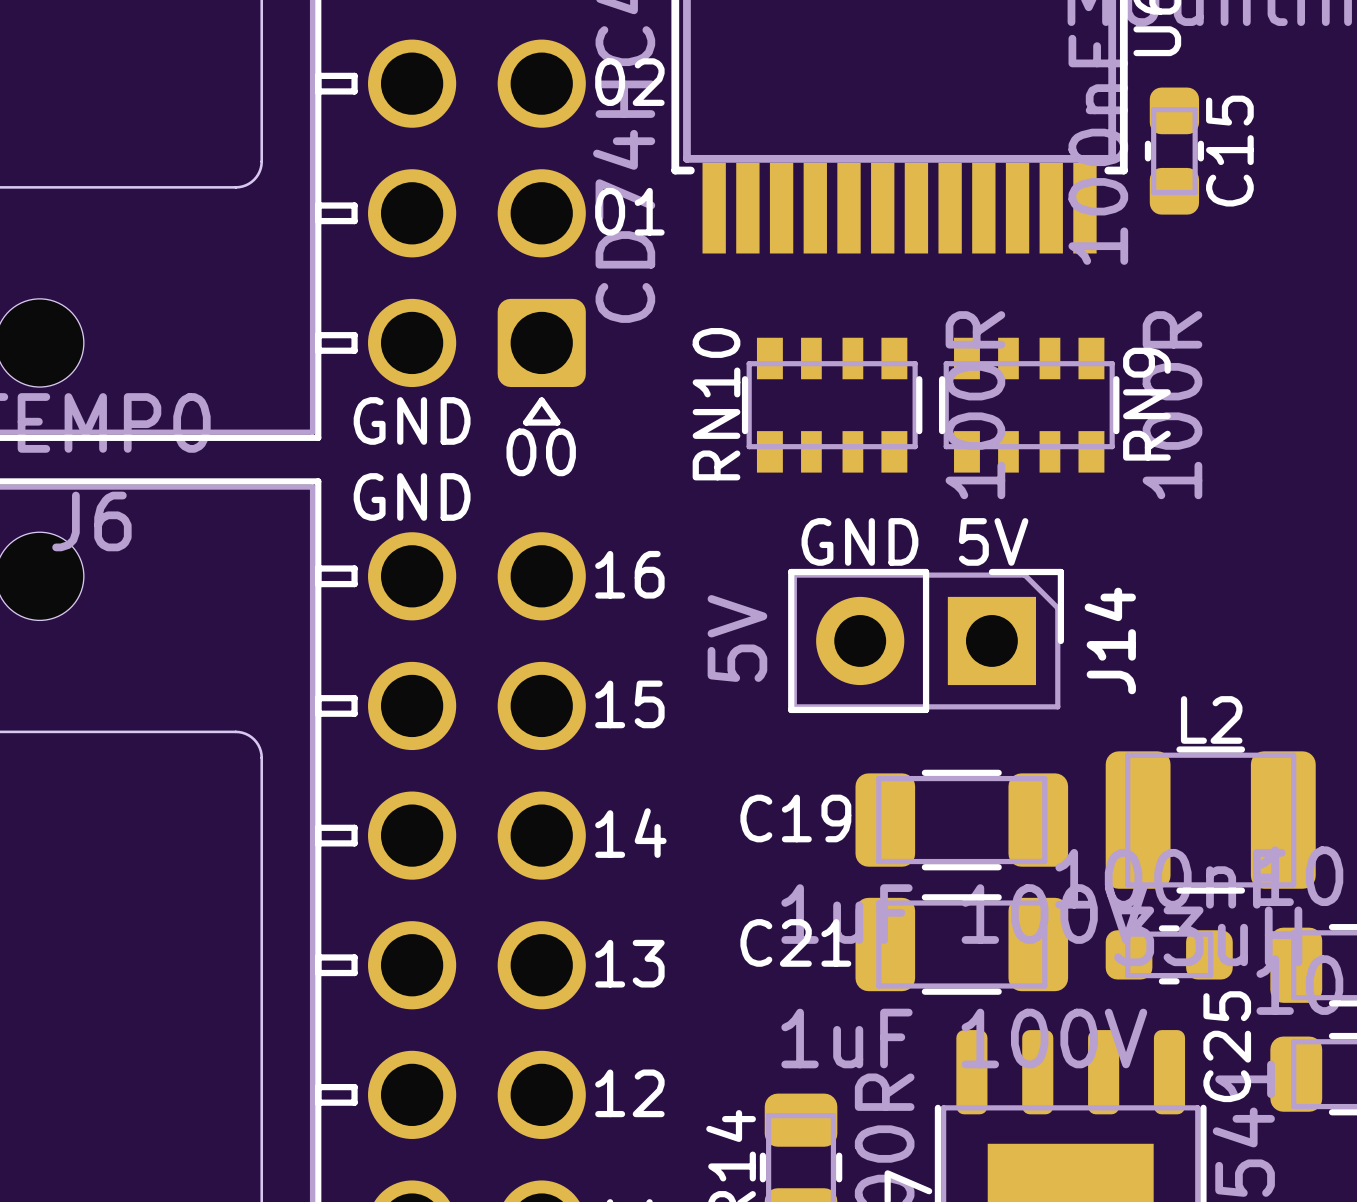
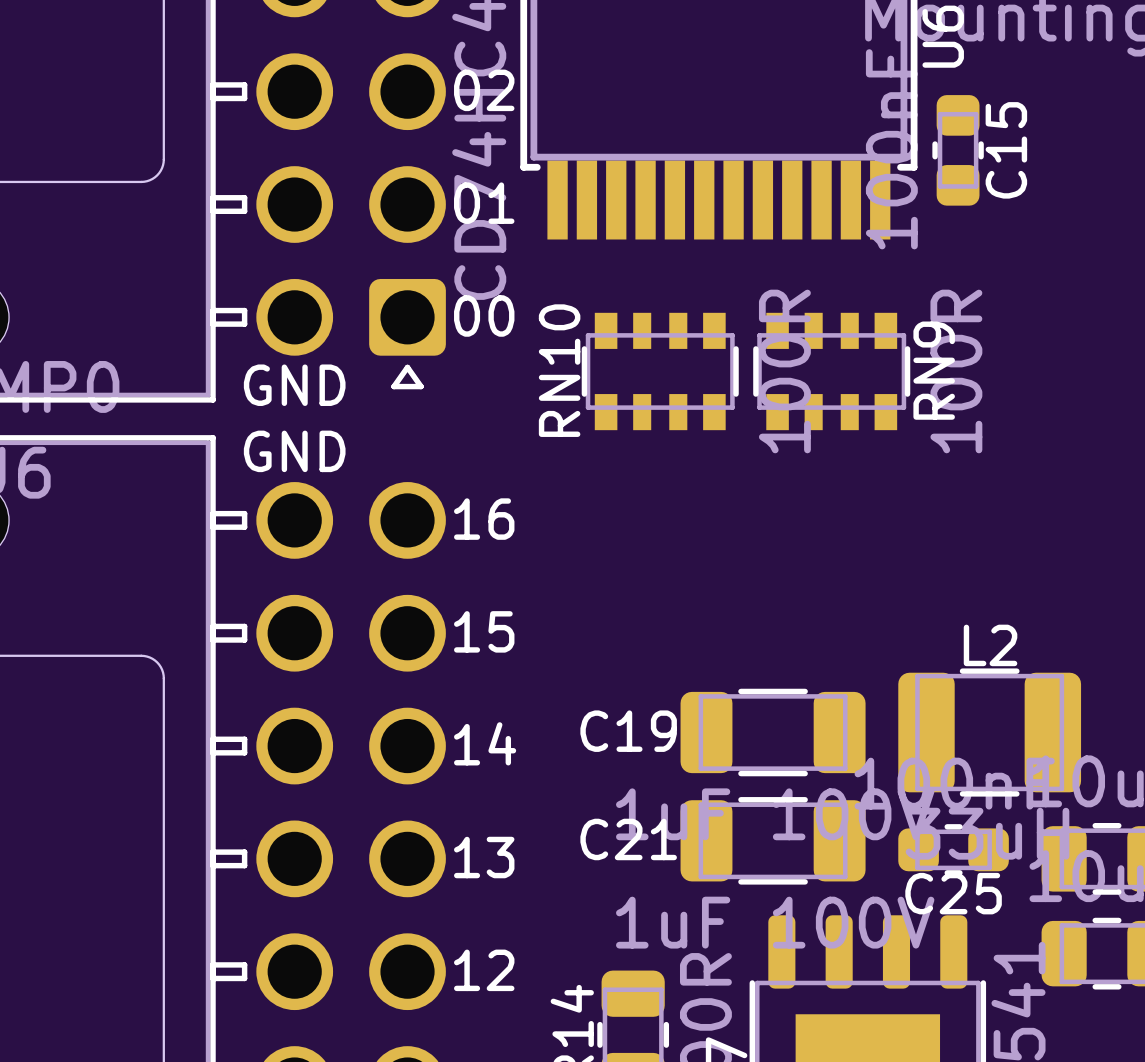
text position: 00 (541, 452) -> 00 (484, 315)
text: GND (859, 541) -> none
text: 5V (993, 541) -> none
J14: 5V (926, 640) -> none
C25 name rotation: 0° (1227, 1046) -> 90° clockwise (953, 893)

